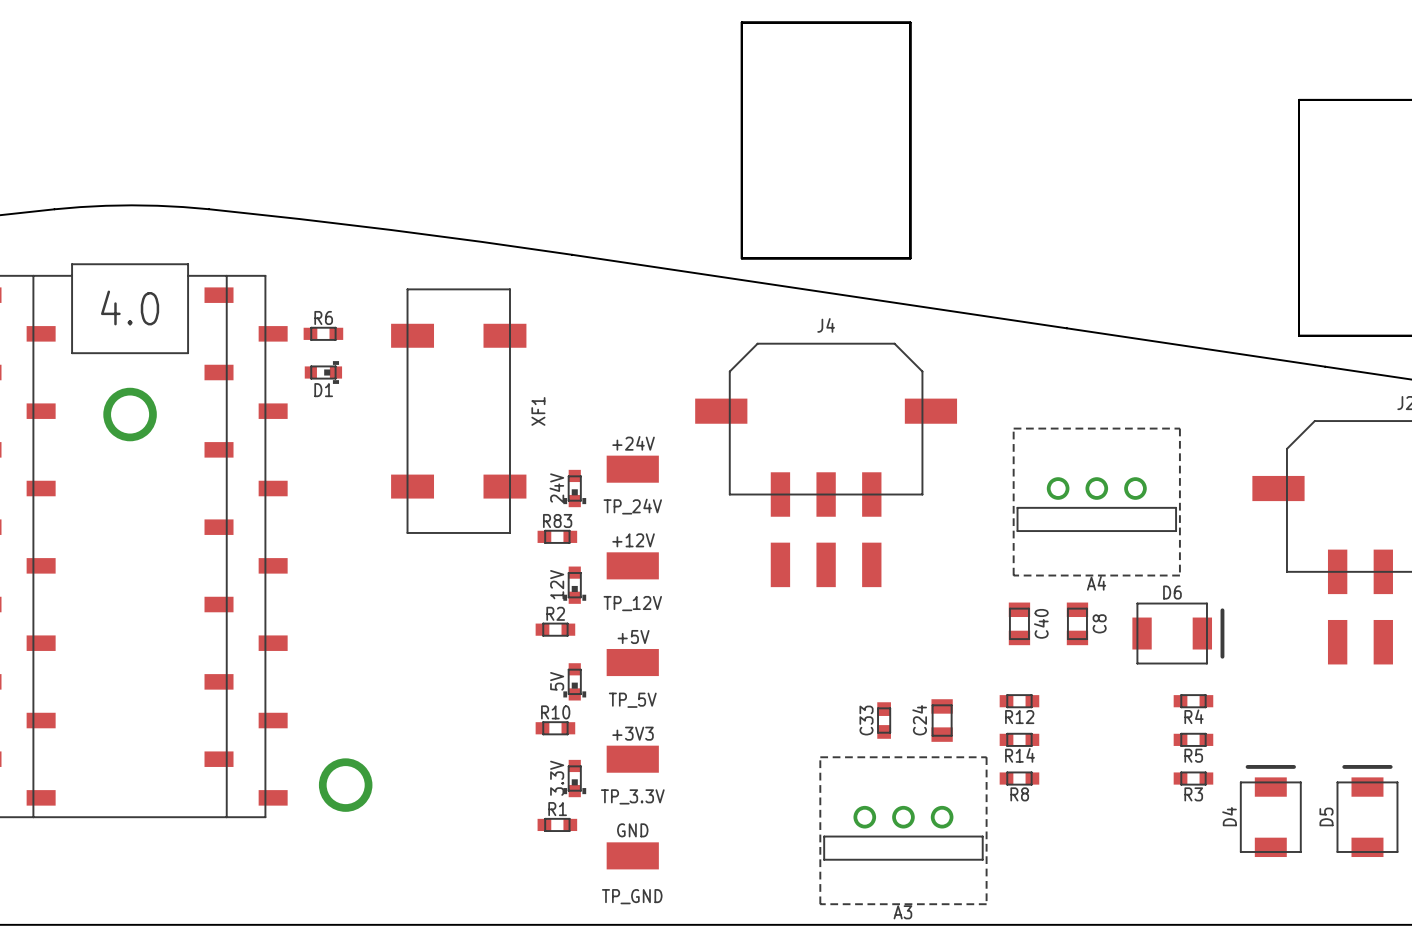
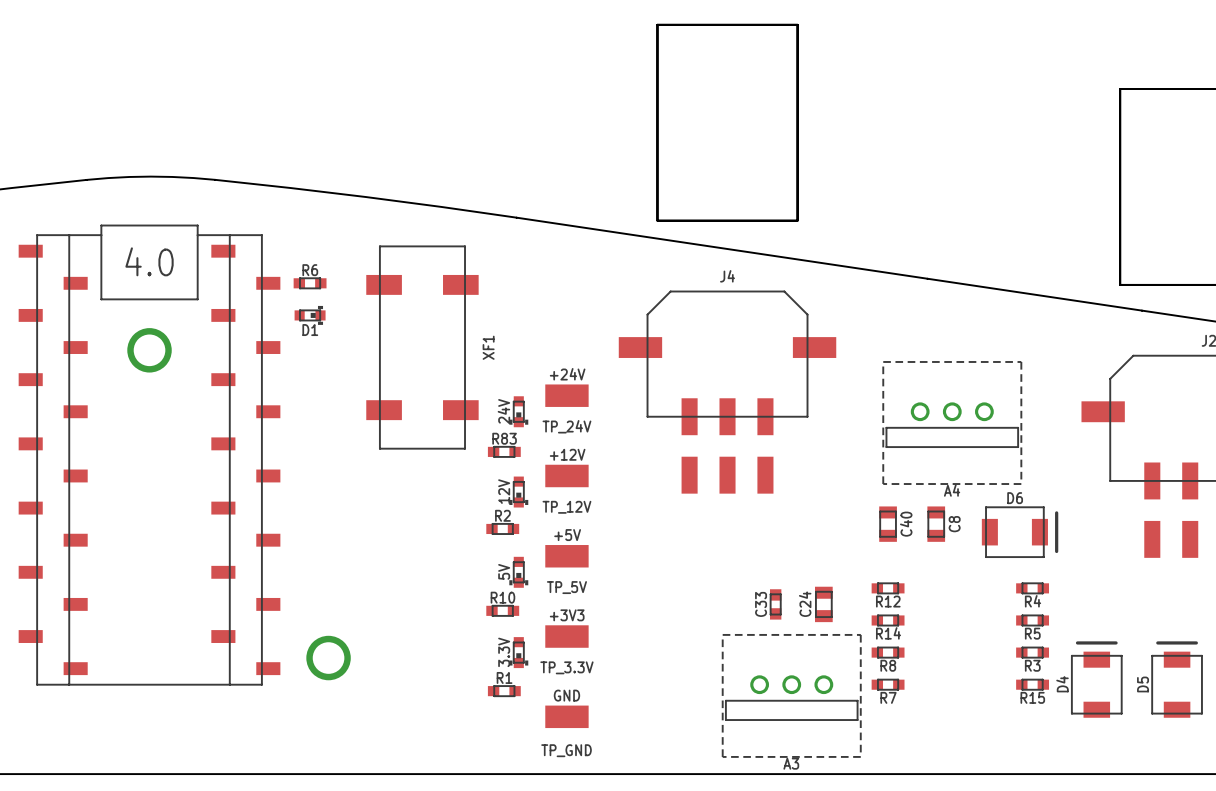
R7: none -> (888, 684)
R15: none -> (1032, 684)

